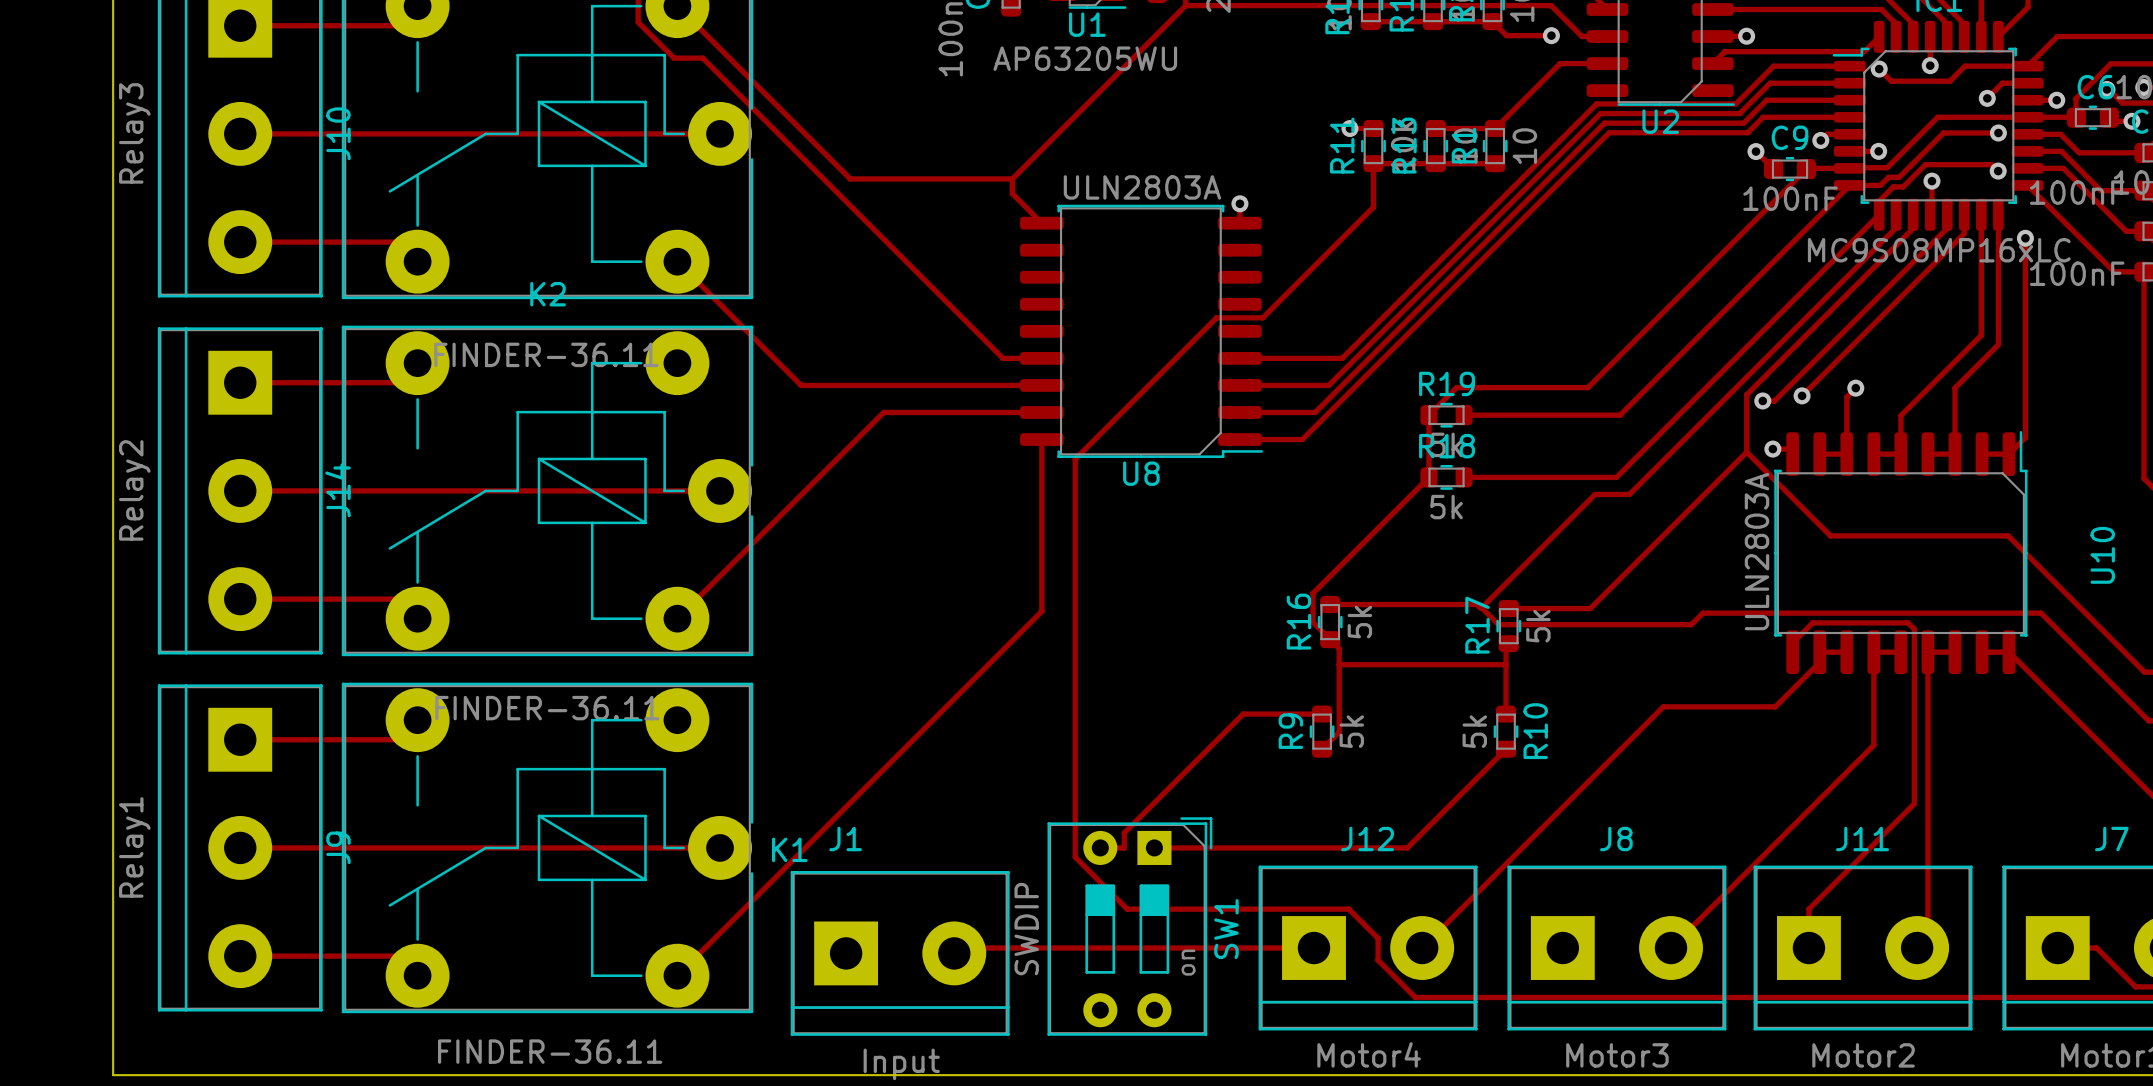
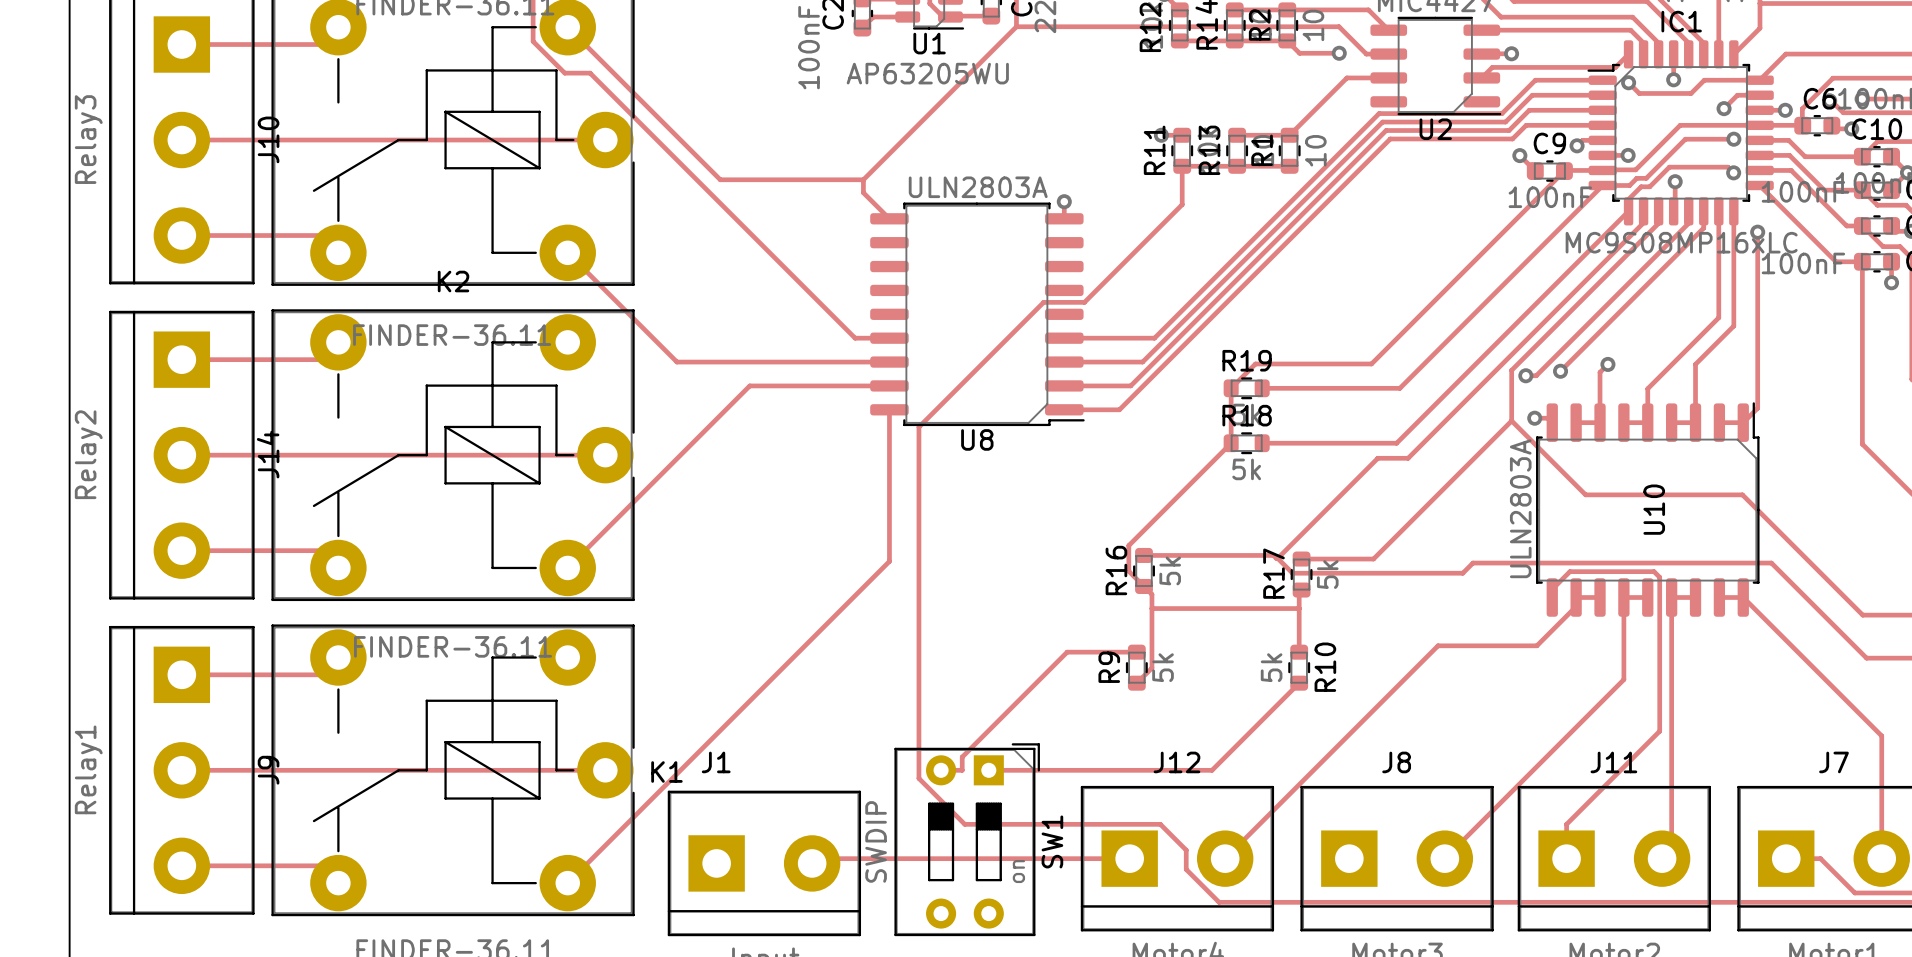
U10 name position: U10 (2102, 555) -> U10 (1654, 509)

